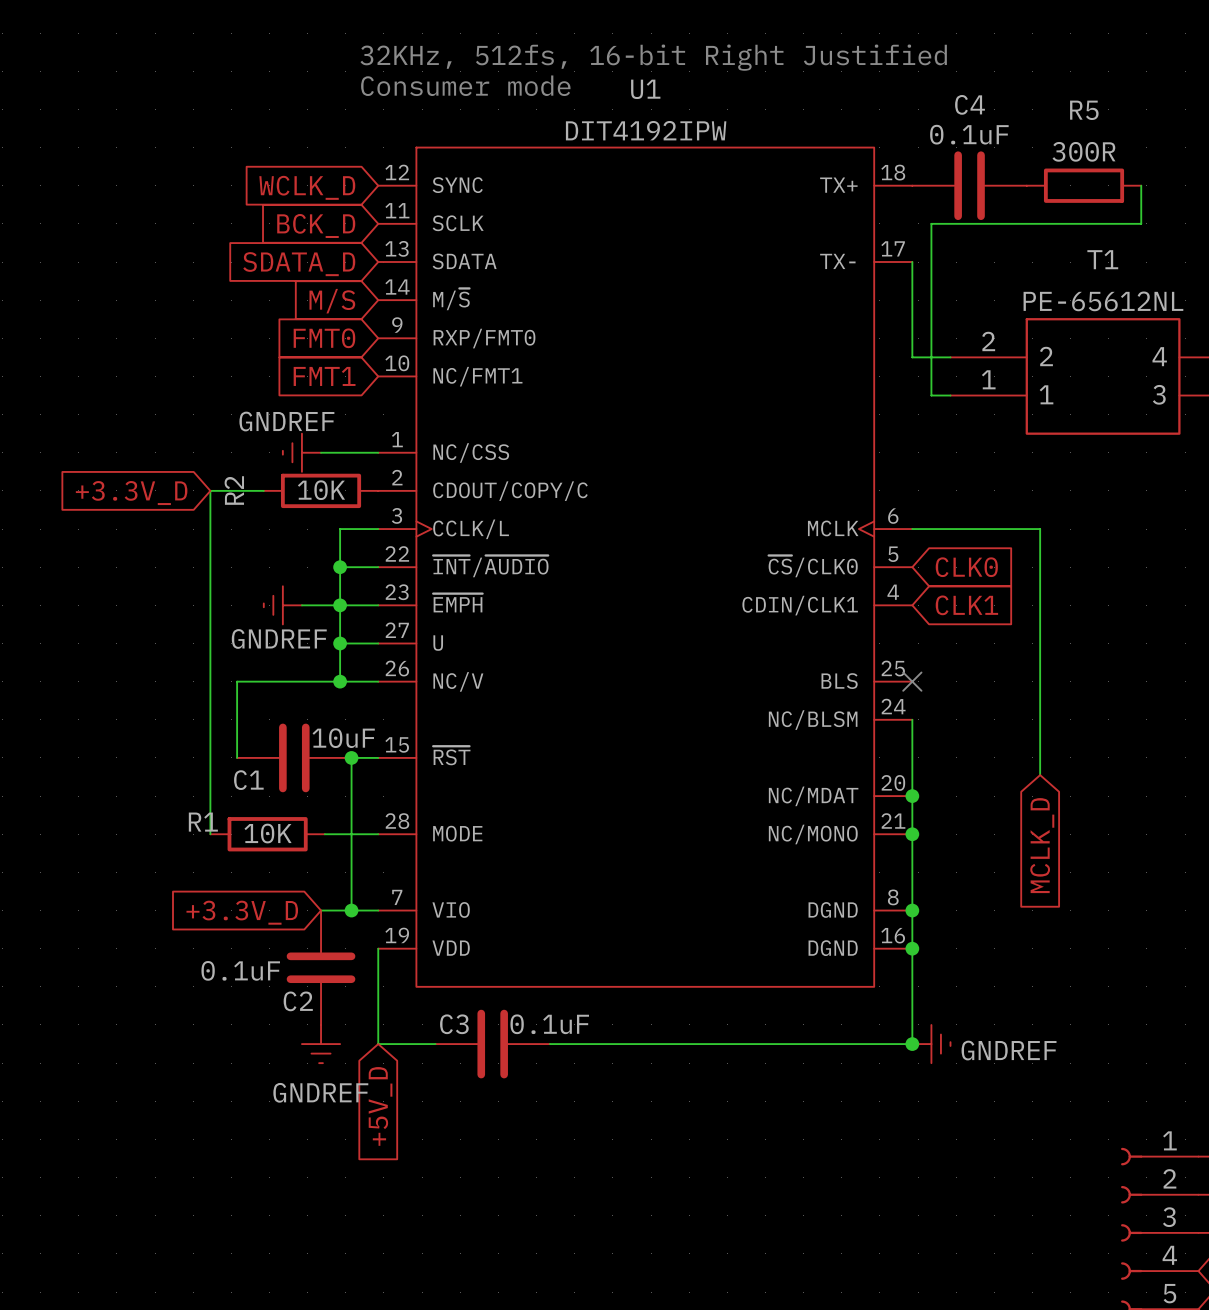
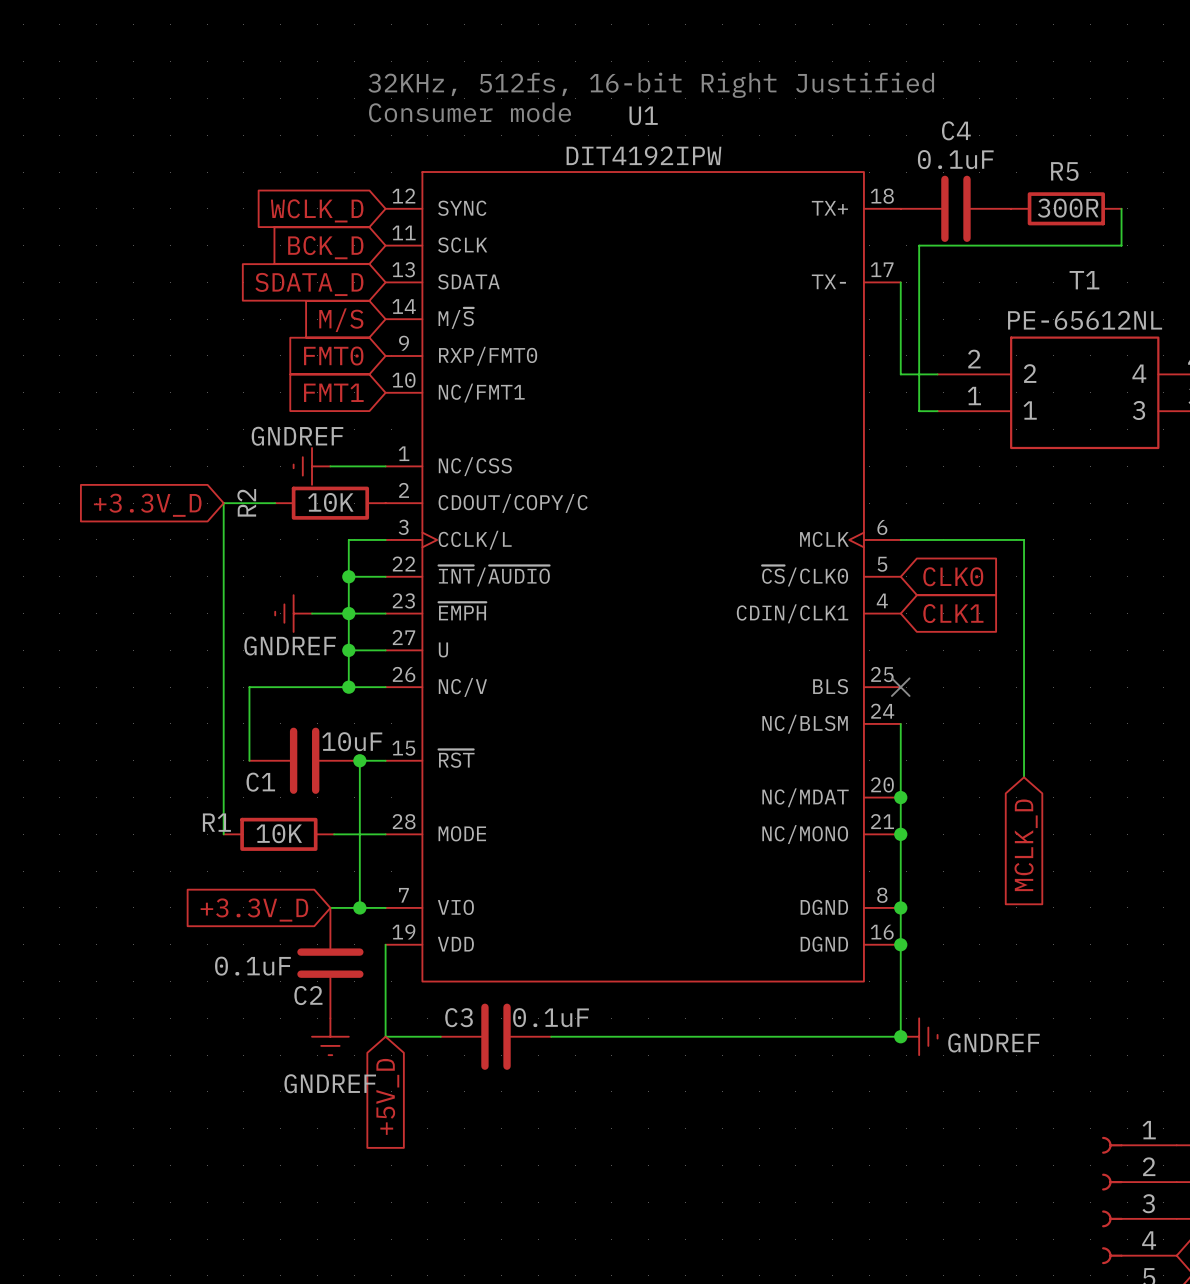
R5 name position: R5 (1084, 110) -> R5 (1064, 171)
R5 value position: 300R (1083, 151) -> 300R (1068, 208)

